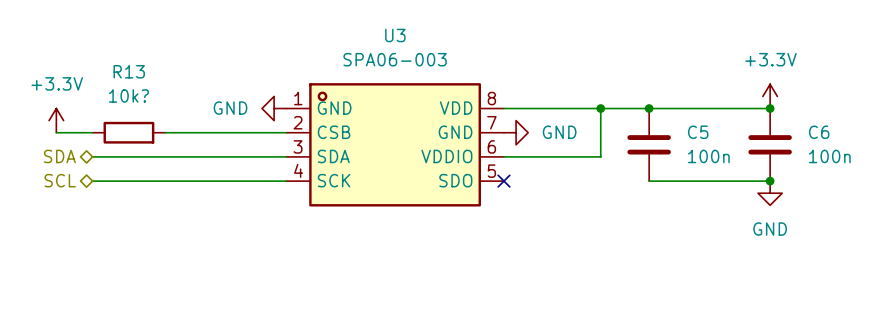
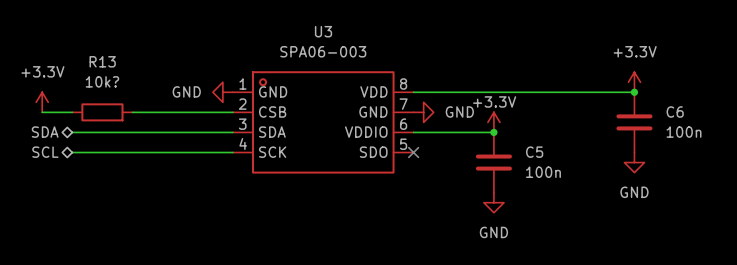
junction: (600, 108) -> none
junction: (649, 108) -> none
power symbol: none -> +3.3V (493, 122)
C5 position: (649, 144) -> (493, 162)
junction: none -> (493, 132)
wire: (649, 181) (770, 181) -> none
junction: (770, 181) -> none
power symbol: none -> GND (493, 202)

